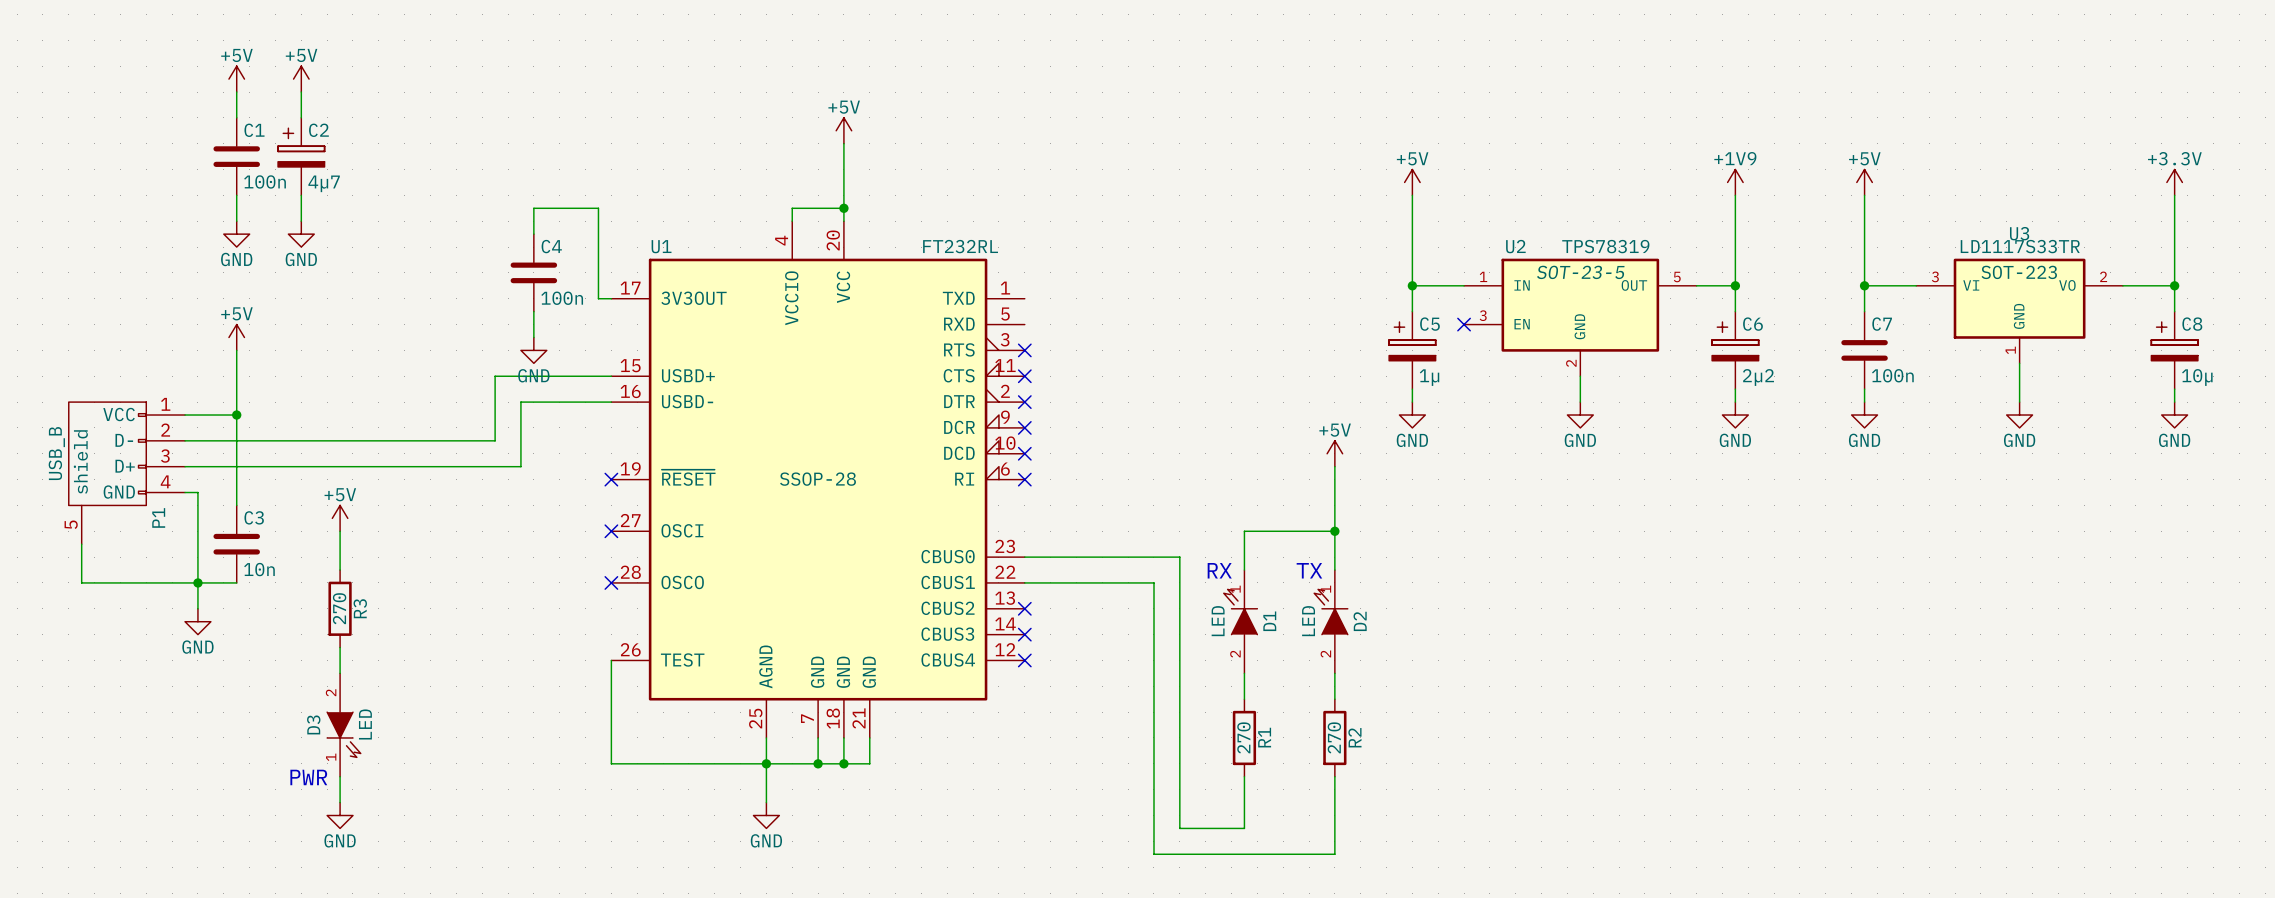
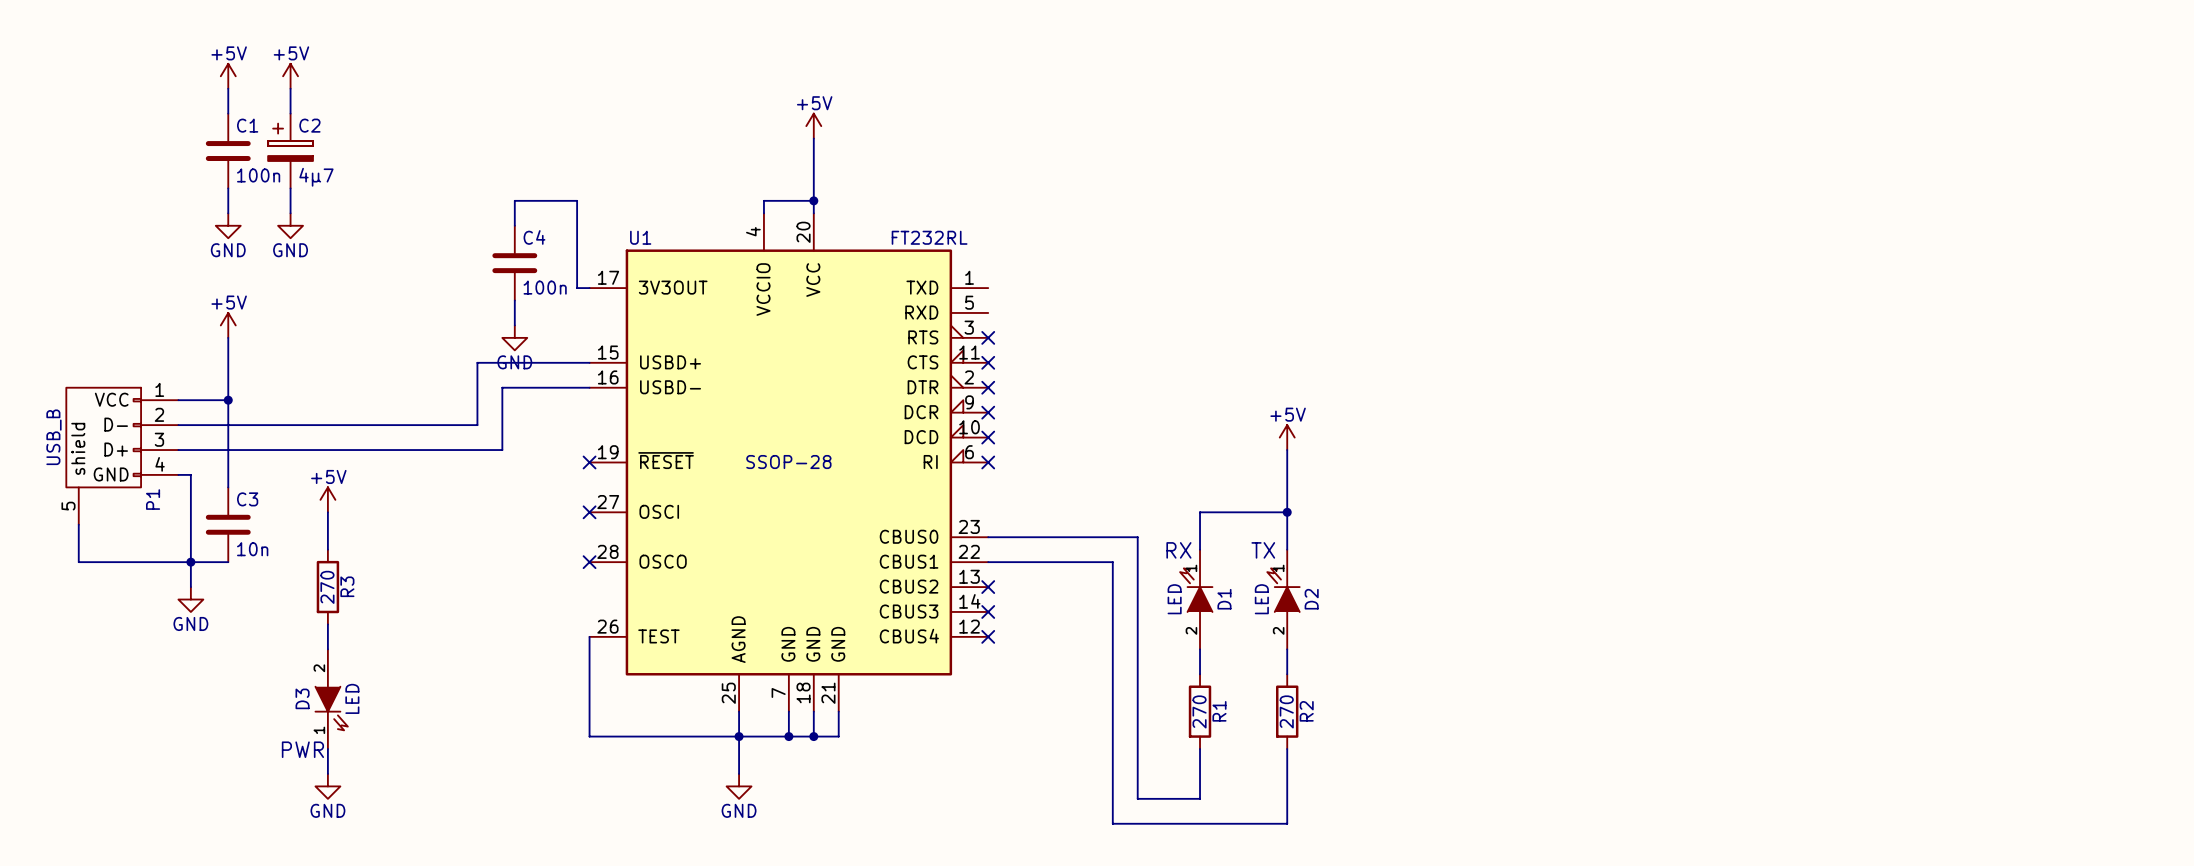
power symbol: +5V (1412, 182) -> none
power symbol: +1V9 (1735, 182) -> none
power symbol: +5V (1864, 182) -> none
power symbol: +3.3V (2174, 182) -> none
wire: (1412, 195) (1412, 311) -> none
wire: (1735, 195) (1735, 311) -> none
wire: (1864, 195) (1864, 311) -> none
wire: (2174, 195) (2174, 311) -> none
wire: (1412, 285) (1464, 285) -> none
junction: (1412, 285) -> none
wire: (1696, 285) (1735, 285) -> none
junction: (1735, 285) -> none
wire: (1864, 285) (1916, 285) -> none
junction: (1864, 285) -> none
wire: (2122, 285) (2174, 285) -> none
junction: (2174, 285) -> none
U3: LD1117S33TR (2019, 311) -> none
U2: TPS78319 (1580, 317) -> none
no-connect mark: (1464, 324) -> none
C5: 1µ (1412, 350) -> none
C6: 2µ2 (1735, 350) -> none
C7: 100n (1864, 350) -> none
C8: 10µ (2174, 350) -> none
wire: (2019, 363) (2019, 402) -> none
wire: (1580, 376) (1580, 402) -> none
wire: (1412, 389) (1412, 402) -> none
wire: (1735, 389) (1735, 402) -> none
wire: (1864, 389) (1864, 402) -> none
wire: (2174, 389) (2174, 402) -> none
power symbol: GND (1412, 415) -> none
power symbol: GND (1580, 415) -> none
power symbol: GND (1735, 415) -> none
power symbol: GND (1864, 415) -> none
power symbol: GND (2019, 415) -> none
power symbol: GND (2174, 415) -> none

